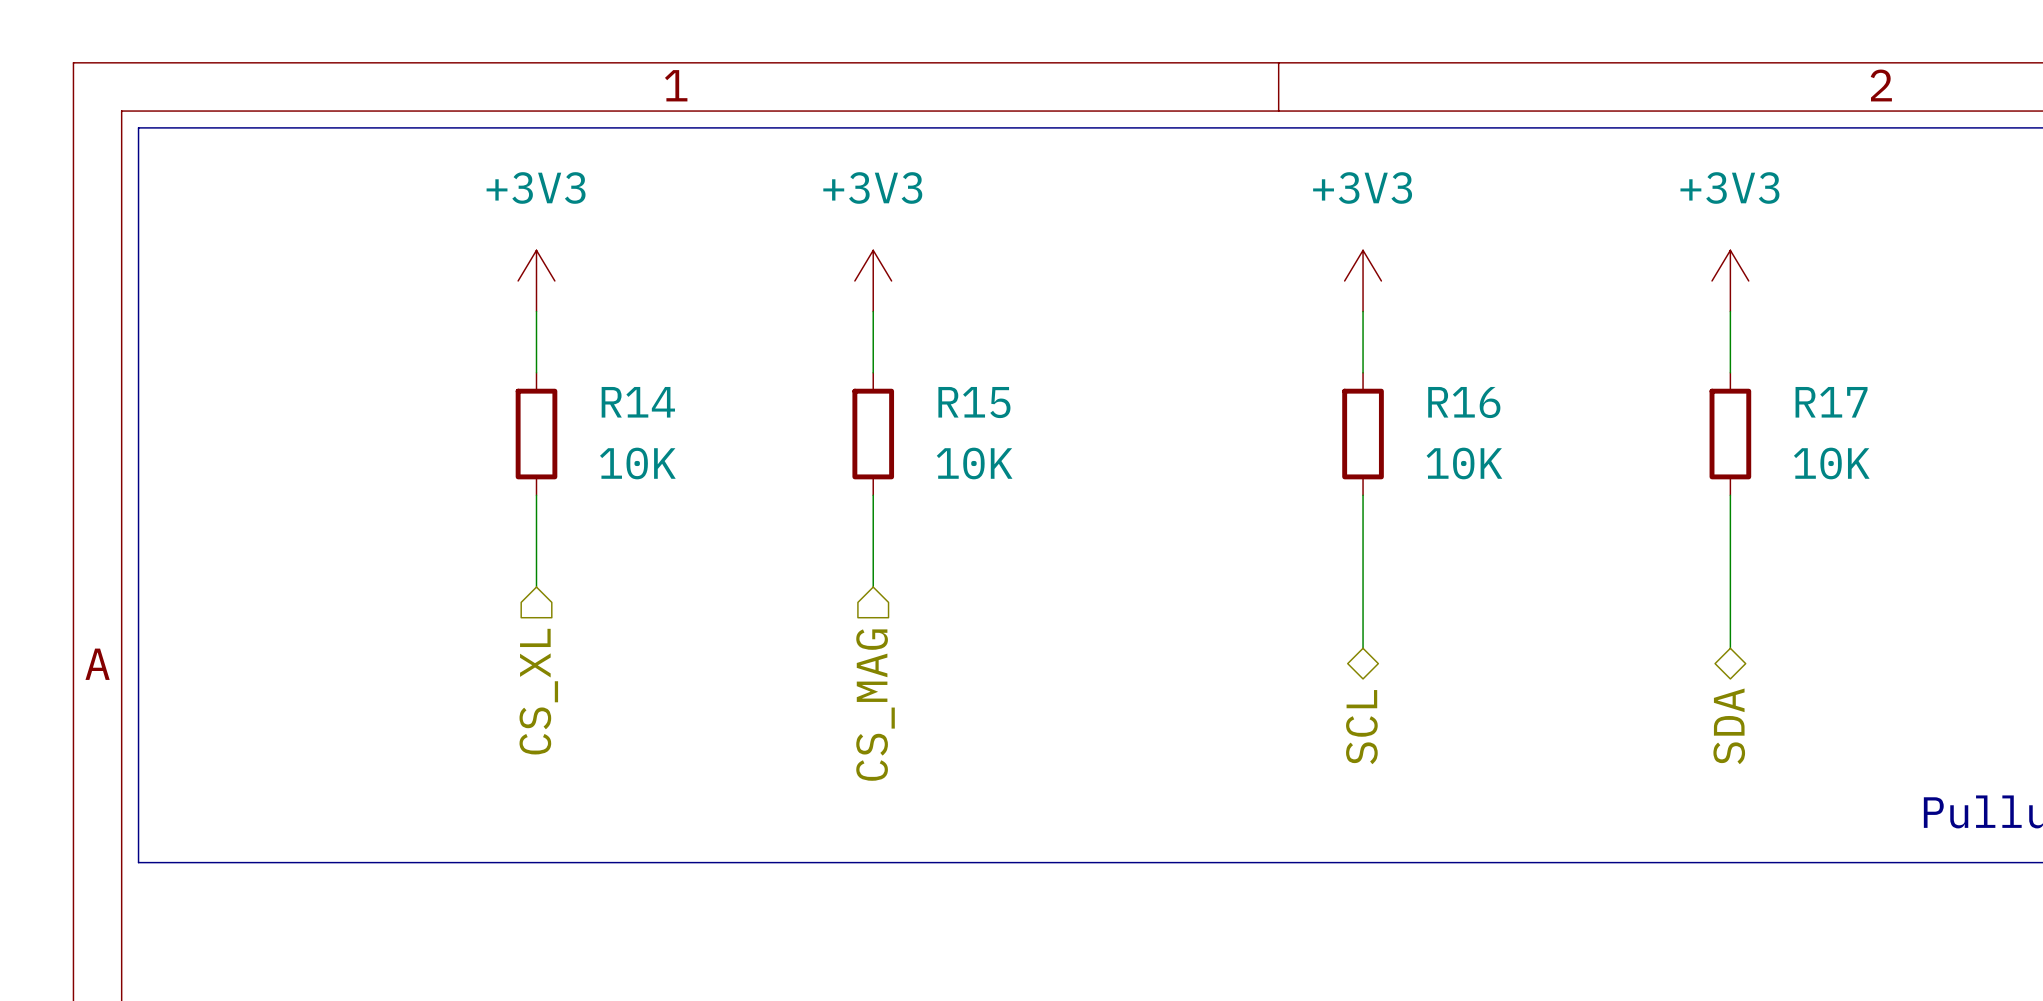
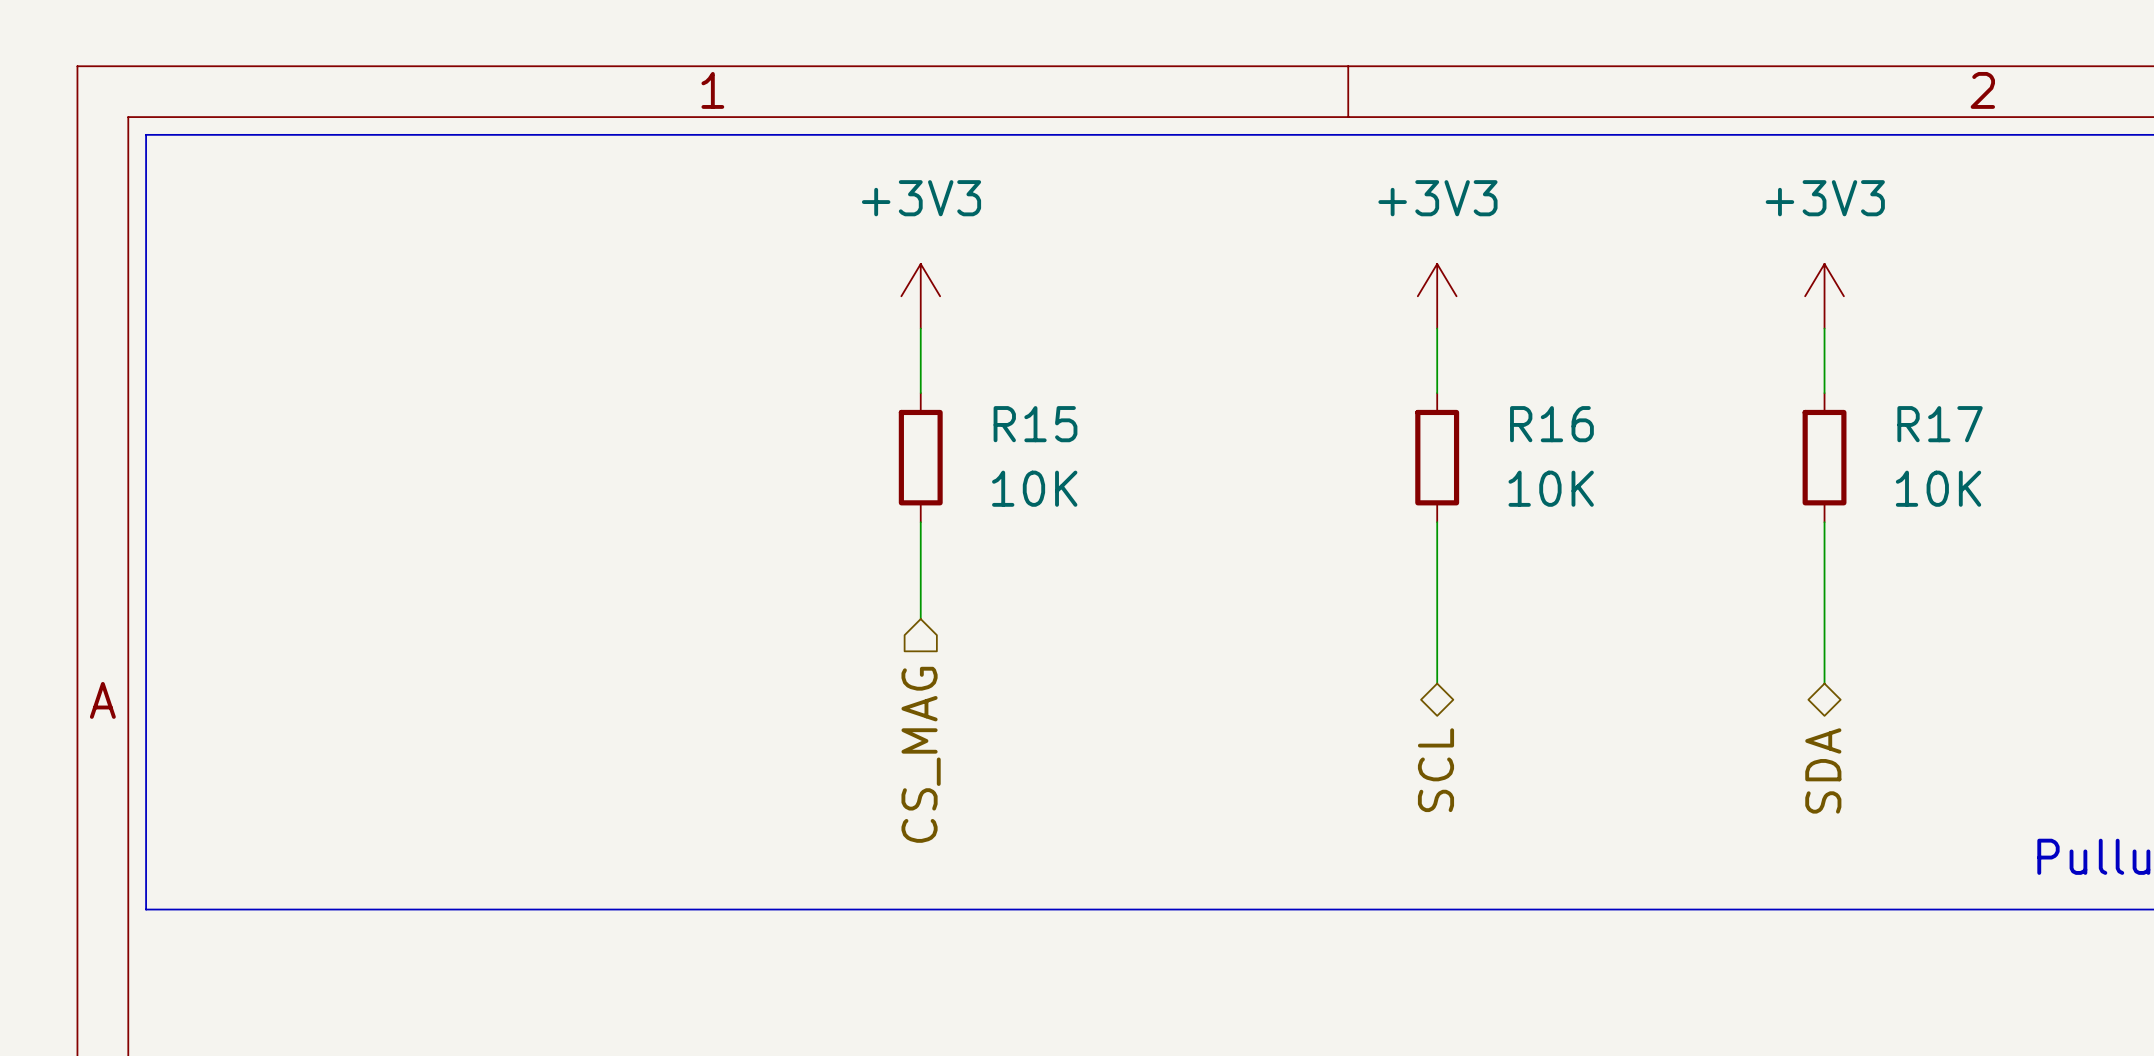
power symbol: +3V3 (536, 280) -> none
wire: (536, 311) (536, 372) -> none
R14: 10K (536, 434) -> none
wire: (536, 495) (536, 587) -> none
hierarchical label: CS_XL (538, 691) -> none

